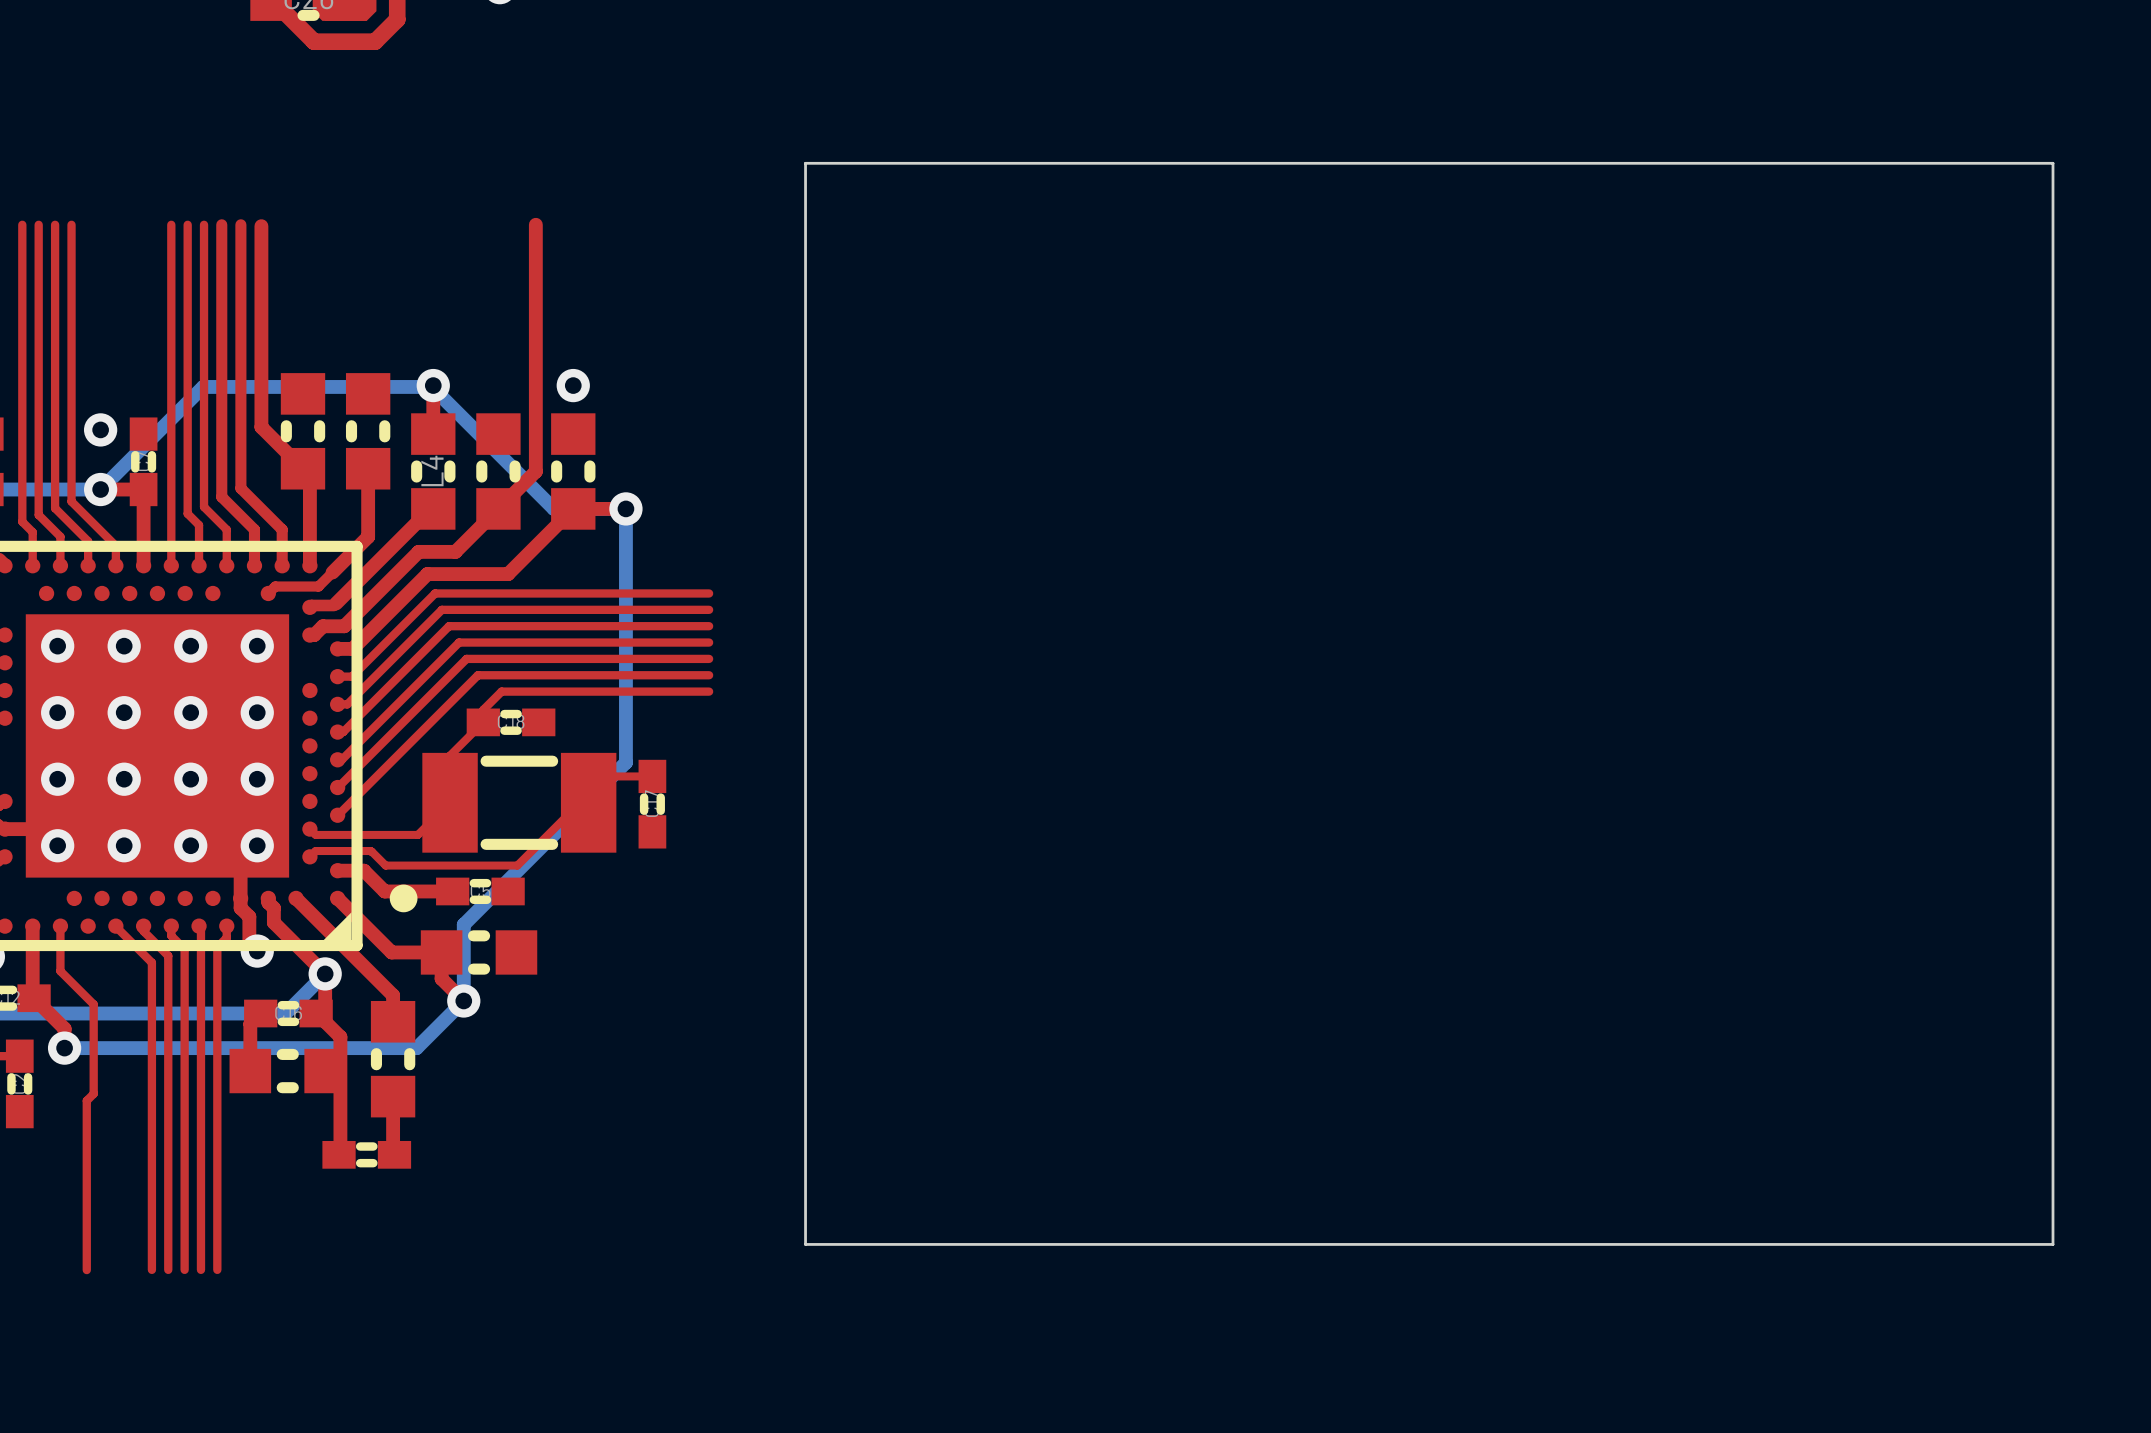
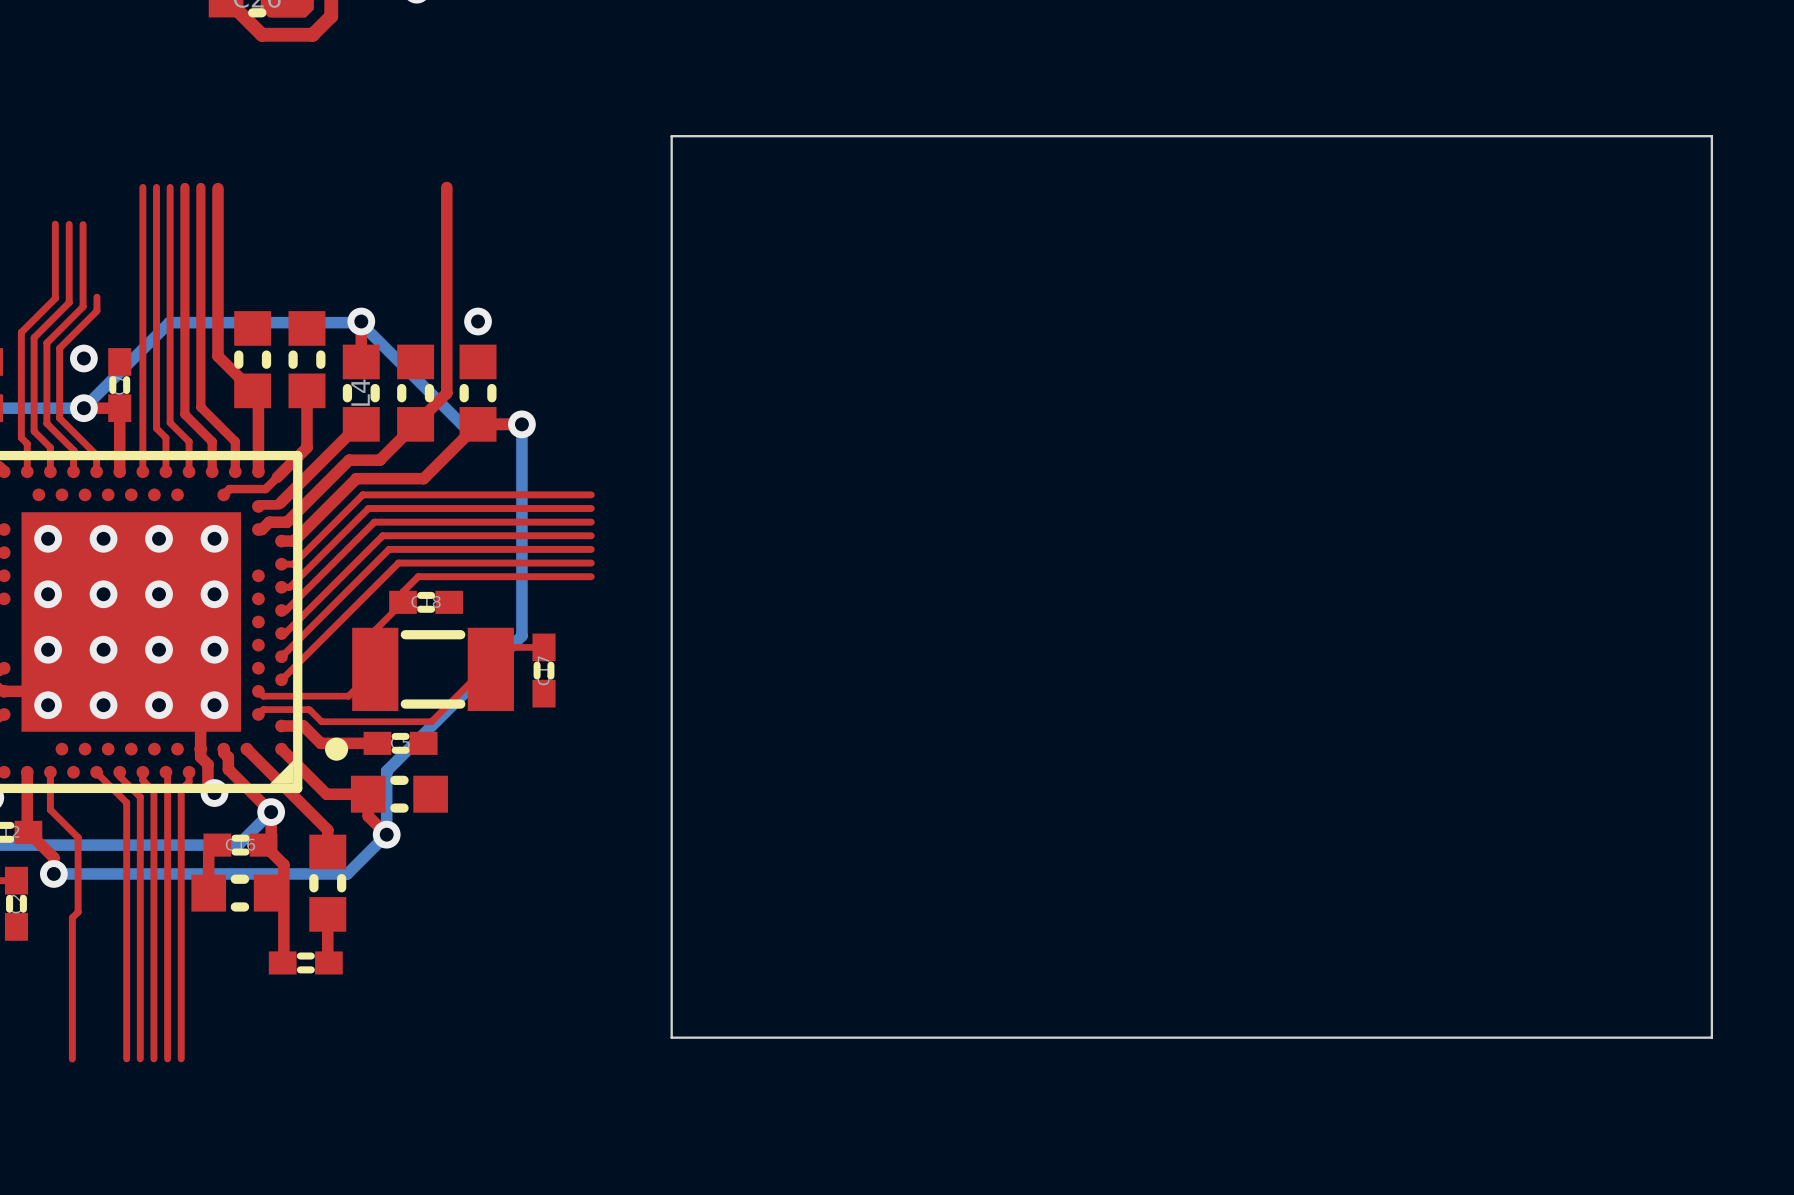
top track: (22, 224) (22, 521) (25, 525) -> (55, 224) (55, 298) (21, 332) (21, 437)
top track: (38, 224) (38, 515) (60, 536) -> (69, 224) (69, 302) (34, 337) (34, 431) (50, 447)
top track: (55, 224) (55, 508) (88, 541) -> (83, 224) (83, 306) (46, 343) (46, 423) (74, 450)
top track: (71, 224) (71, 417) -> (96, 297) (96, 310) (59, 348)

